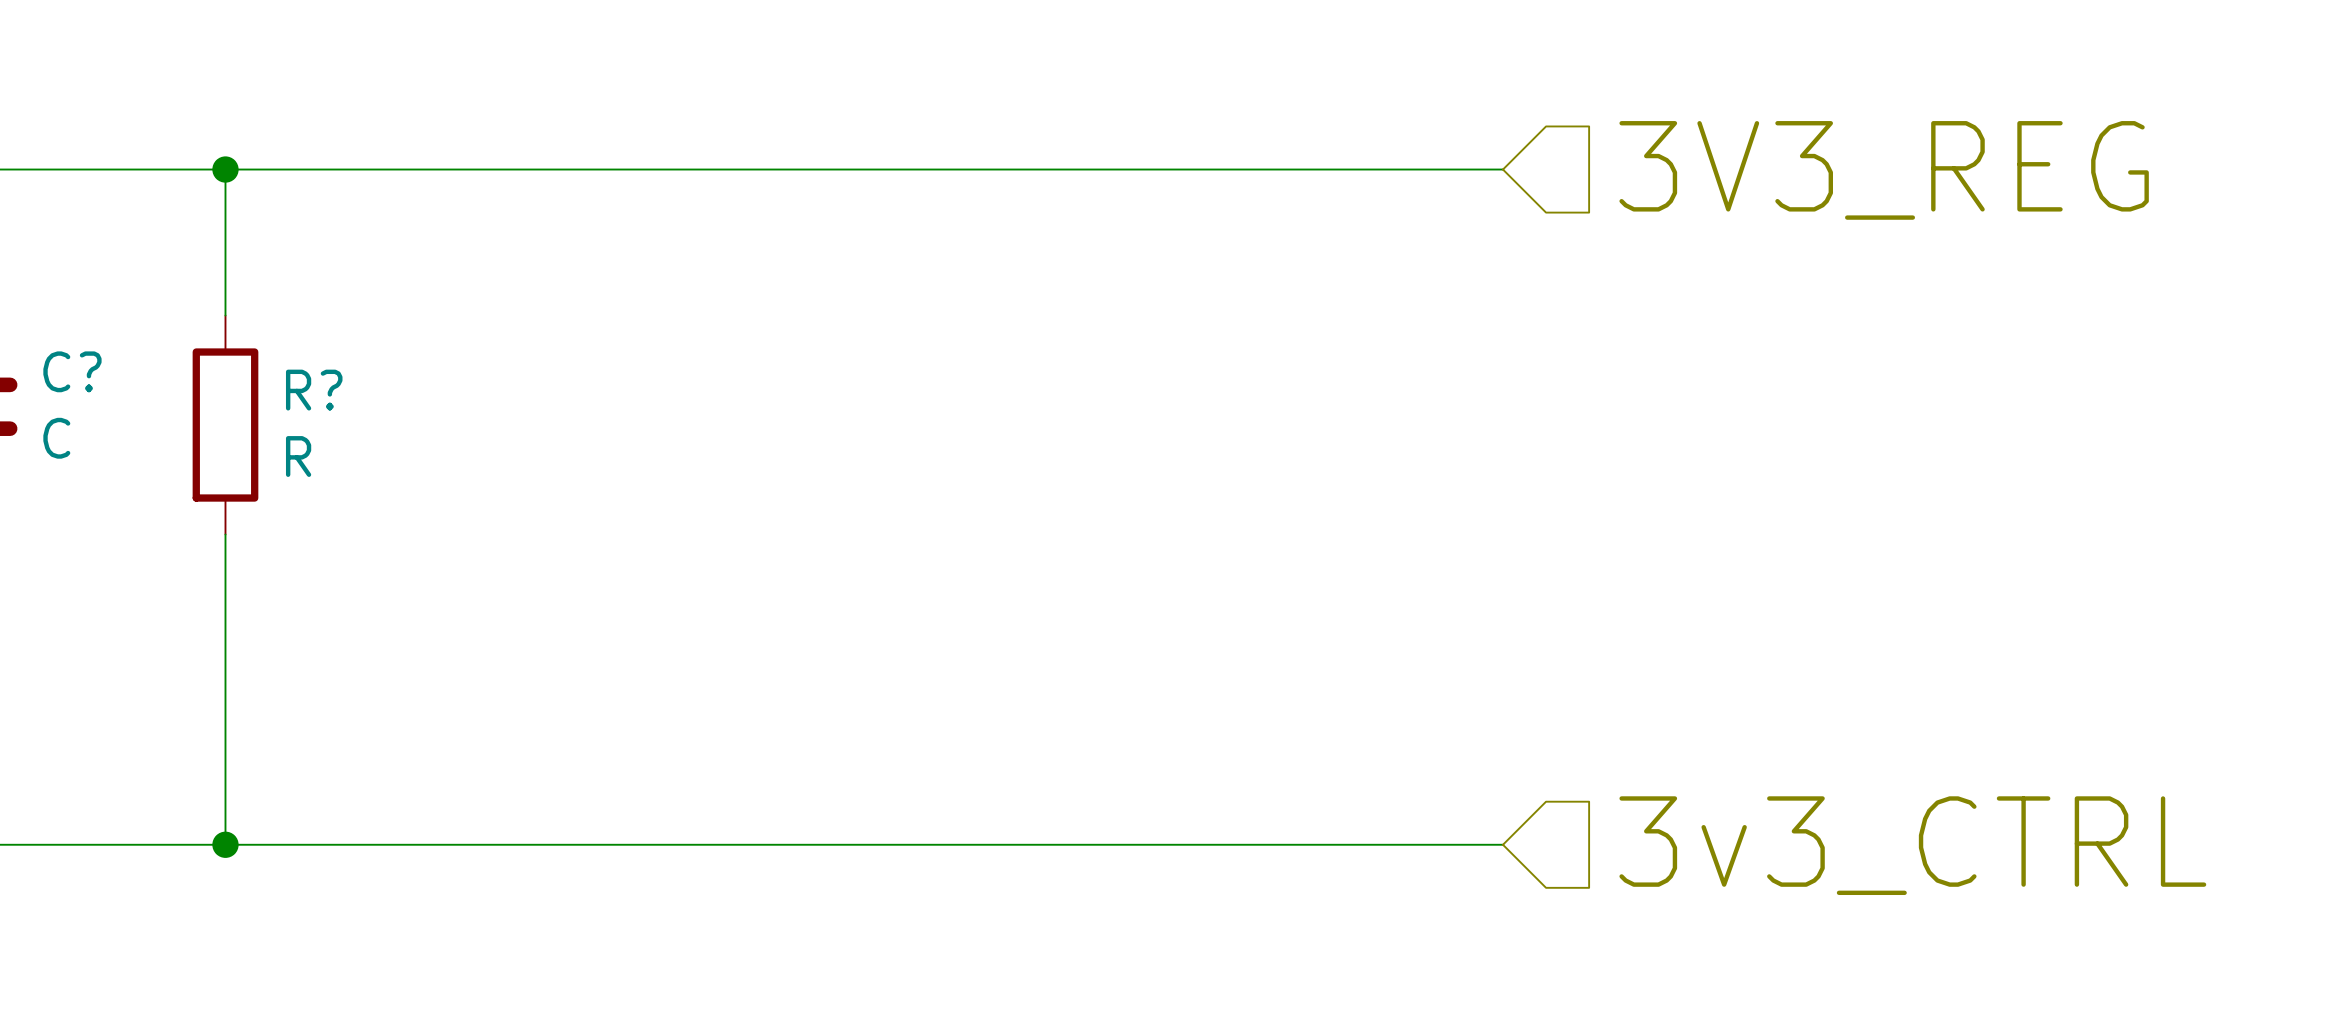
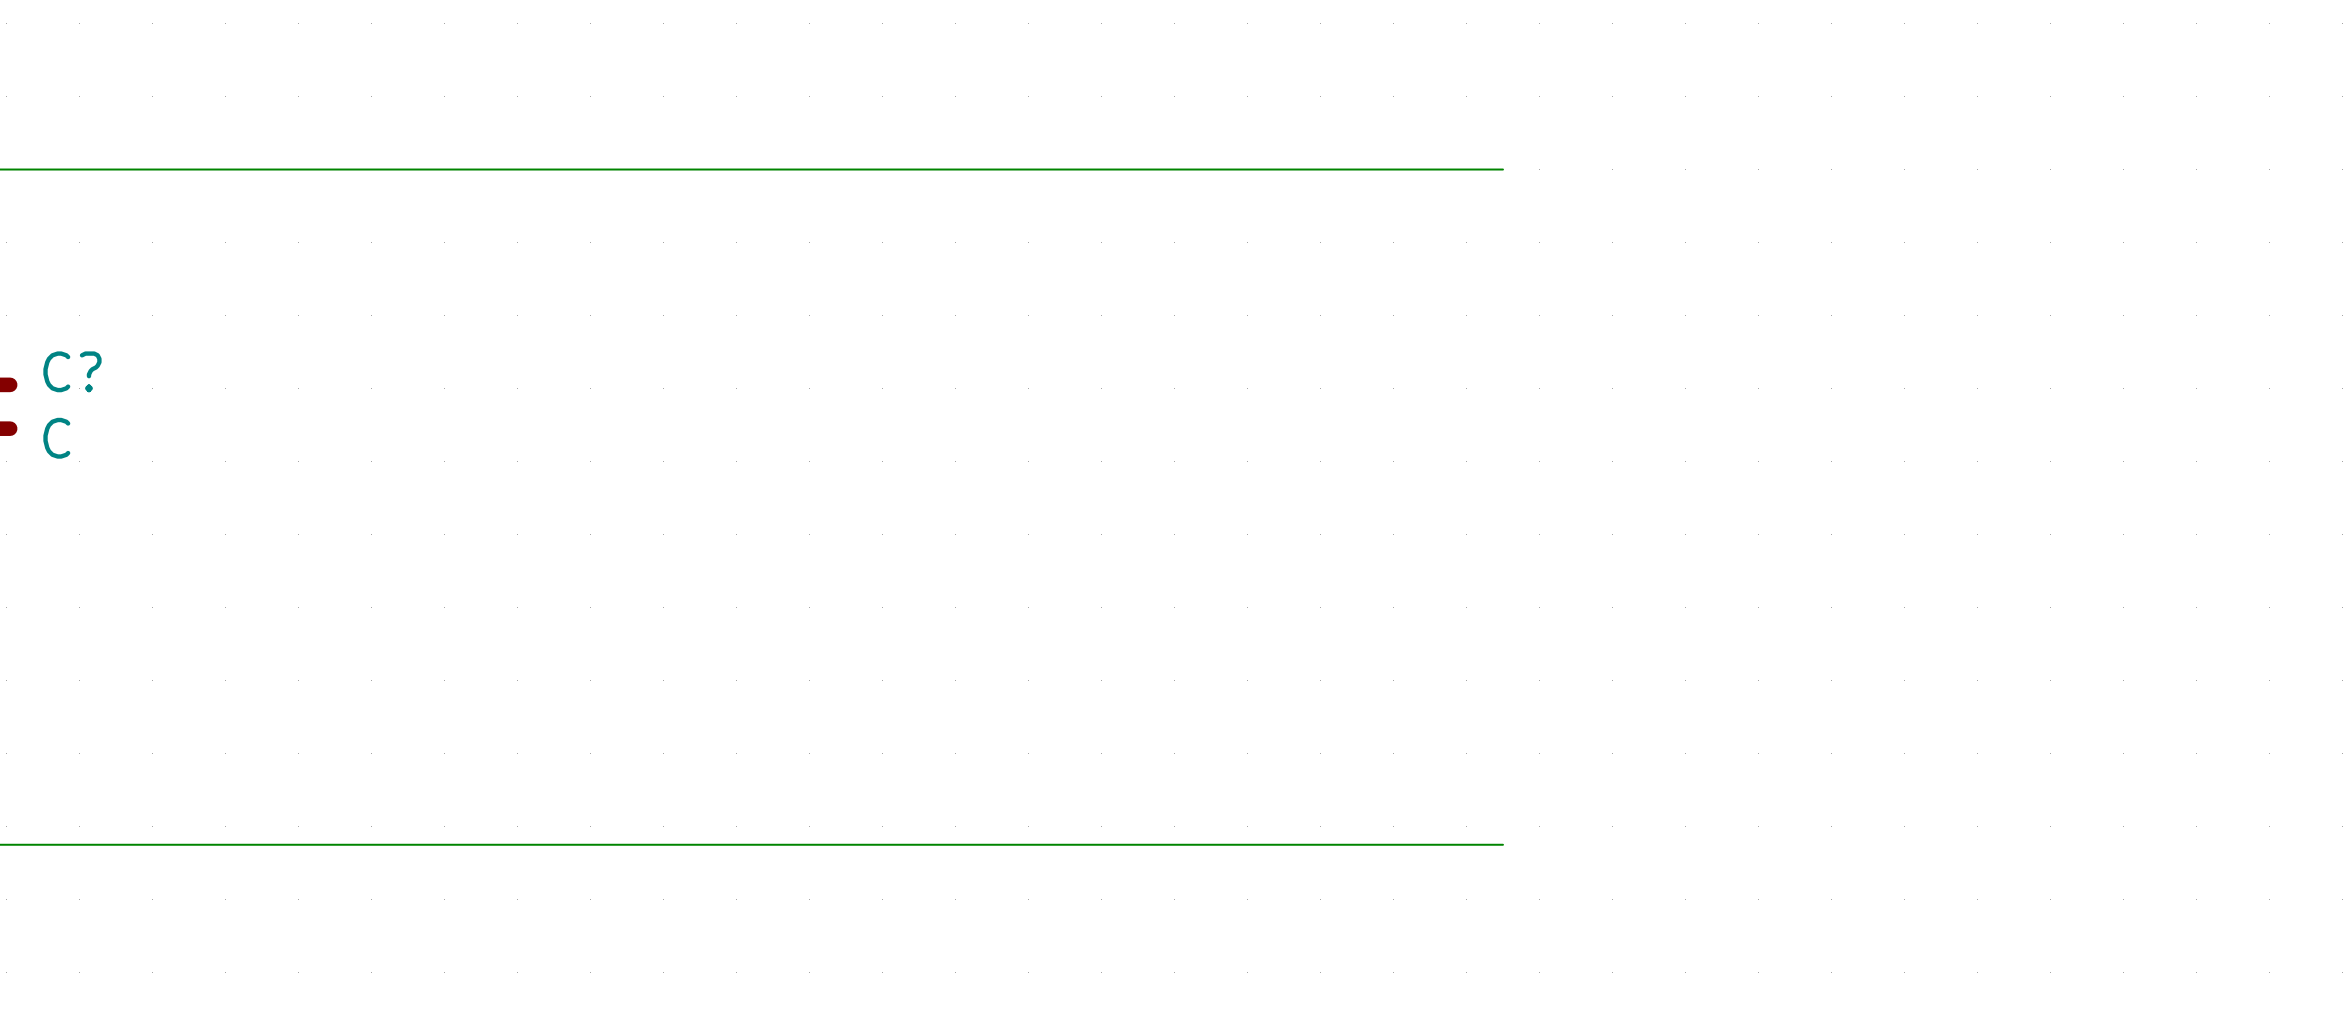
wire: (225, 169) (225, 315) -> none
junction: (225, 169) -> none
hierarchical label: 3V3_REG (1884, 170) -> none
R?: R (225, 425) -> none
wire: (225, 534) (225, 844) -> none
junction: (225, 844) -> none
hierarchical label: 3v3_CTRL (1912, 845) -> none

